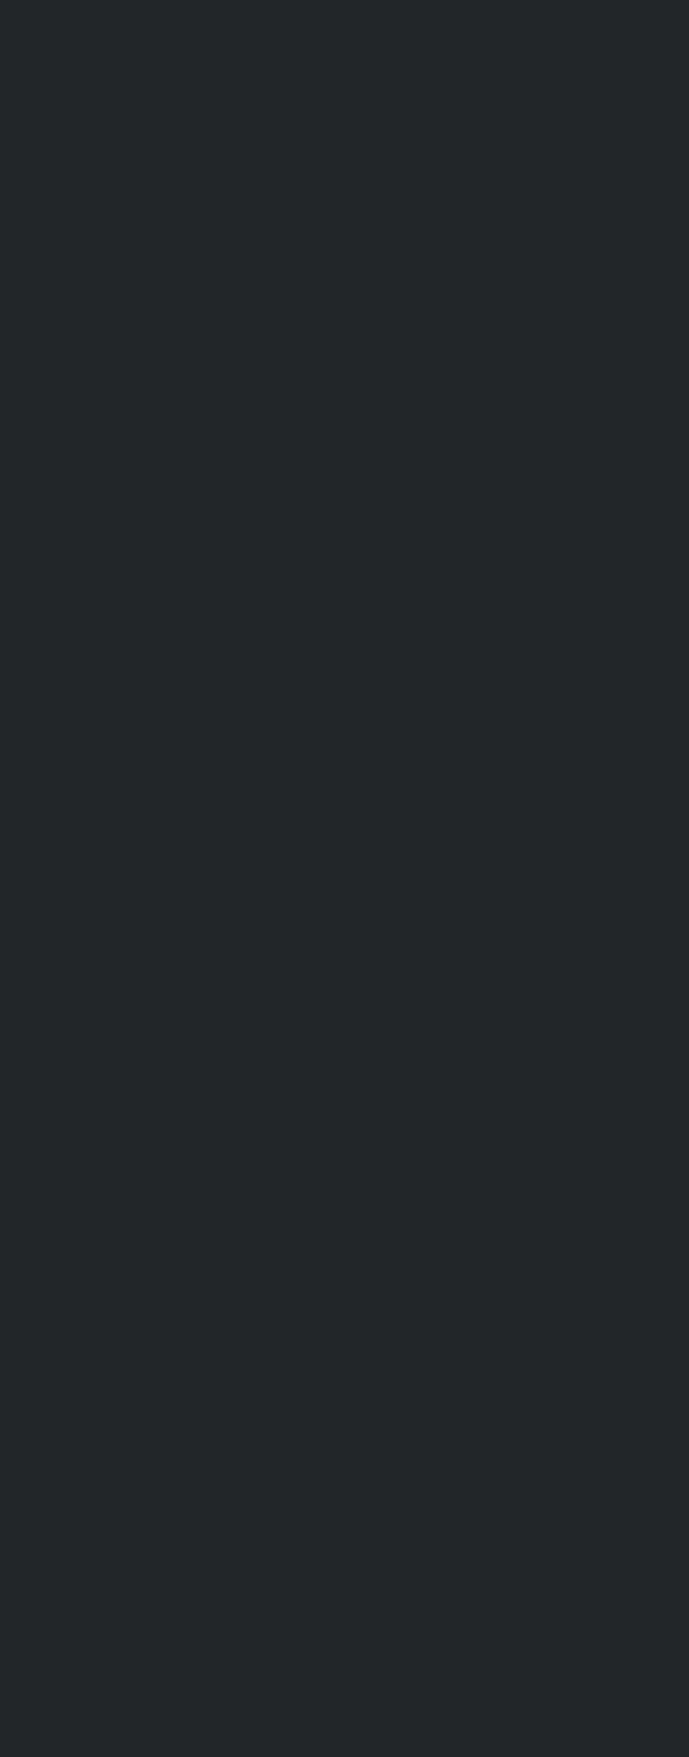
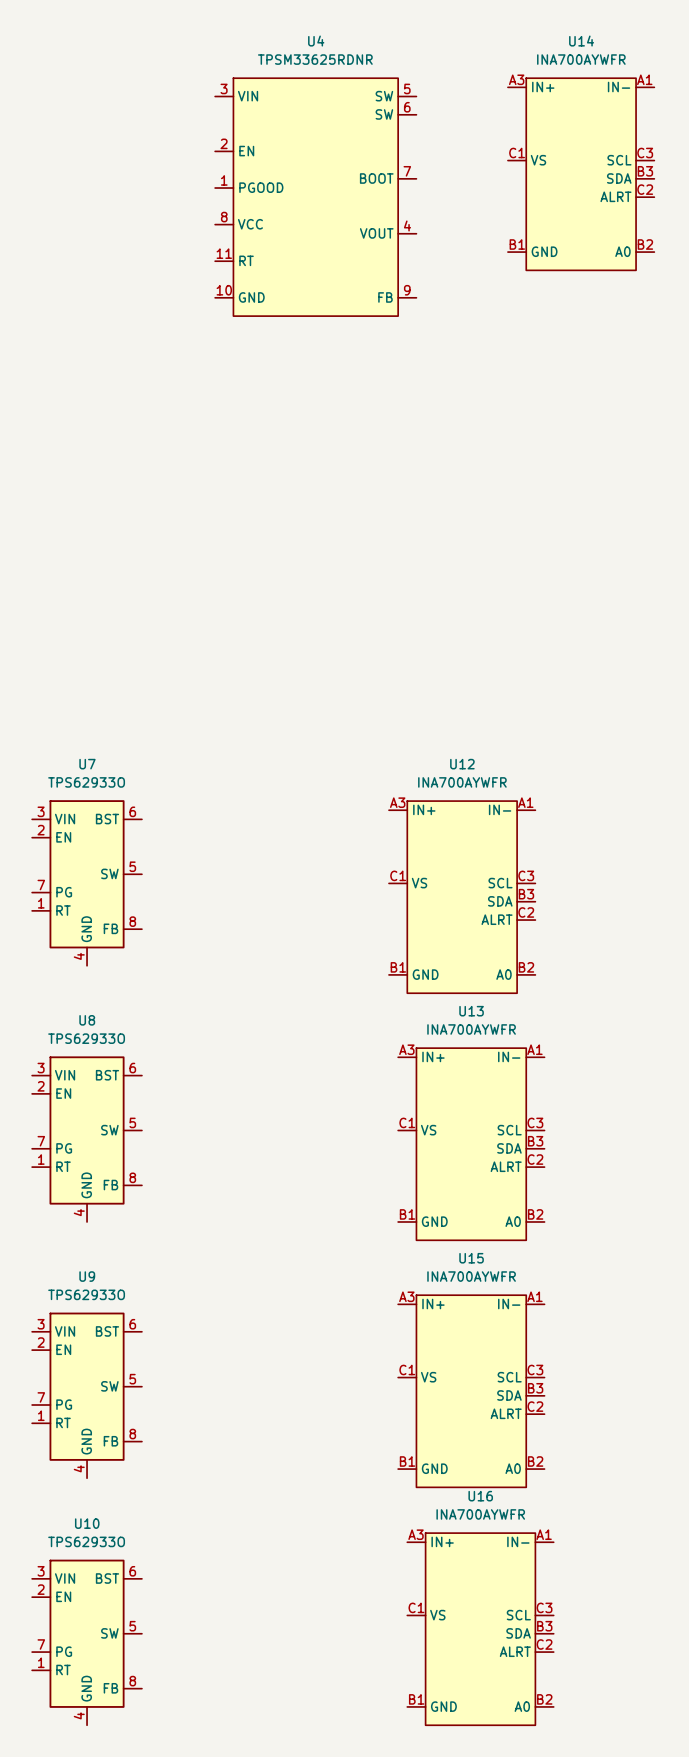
U14: none -> INA700AYWFR (581, 174)
U4: none -> TPSM33625RDNR (315, 197)
U7: none -> TPS62933O (87, 882)
U12: none -> INA700AYWFR (462, 897)
U8: none -> TPS62933O (87, 1139)
U13: none -> INA700AYWFR (471, 1144)
U15: none -> INA700AYWFR (471, 1391)
U9: none -> TPS62933O (87, 1395)
U16: none -> INA700AYWFR (480, 1629)
U10: none -> TPS62933O (87, 1642)

